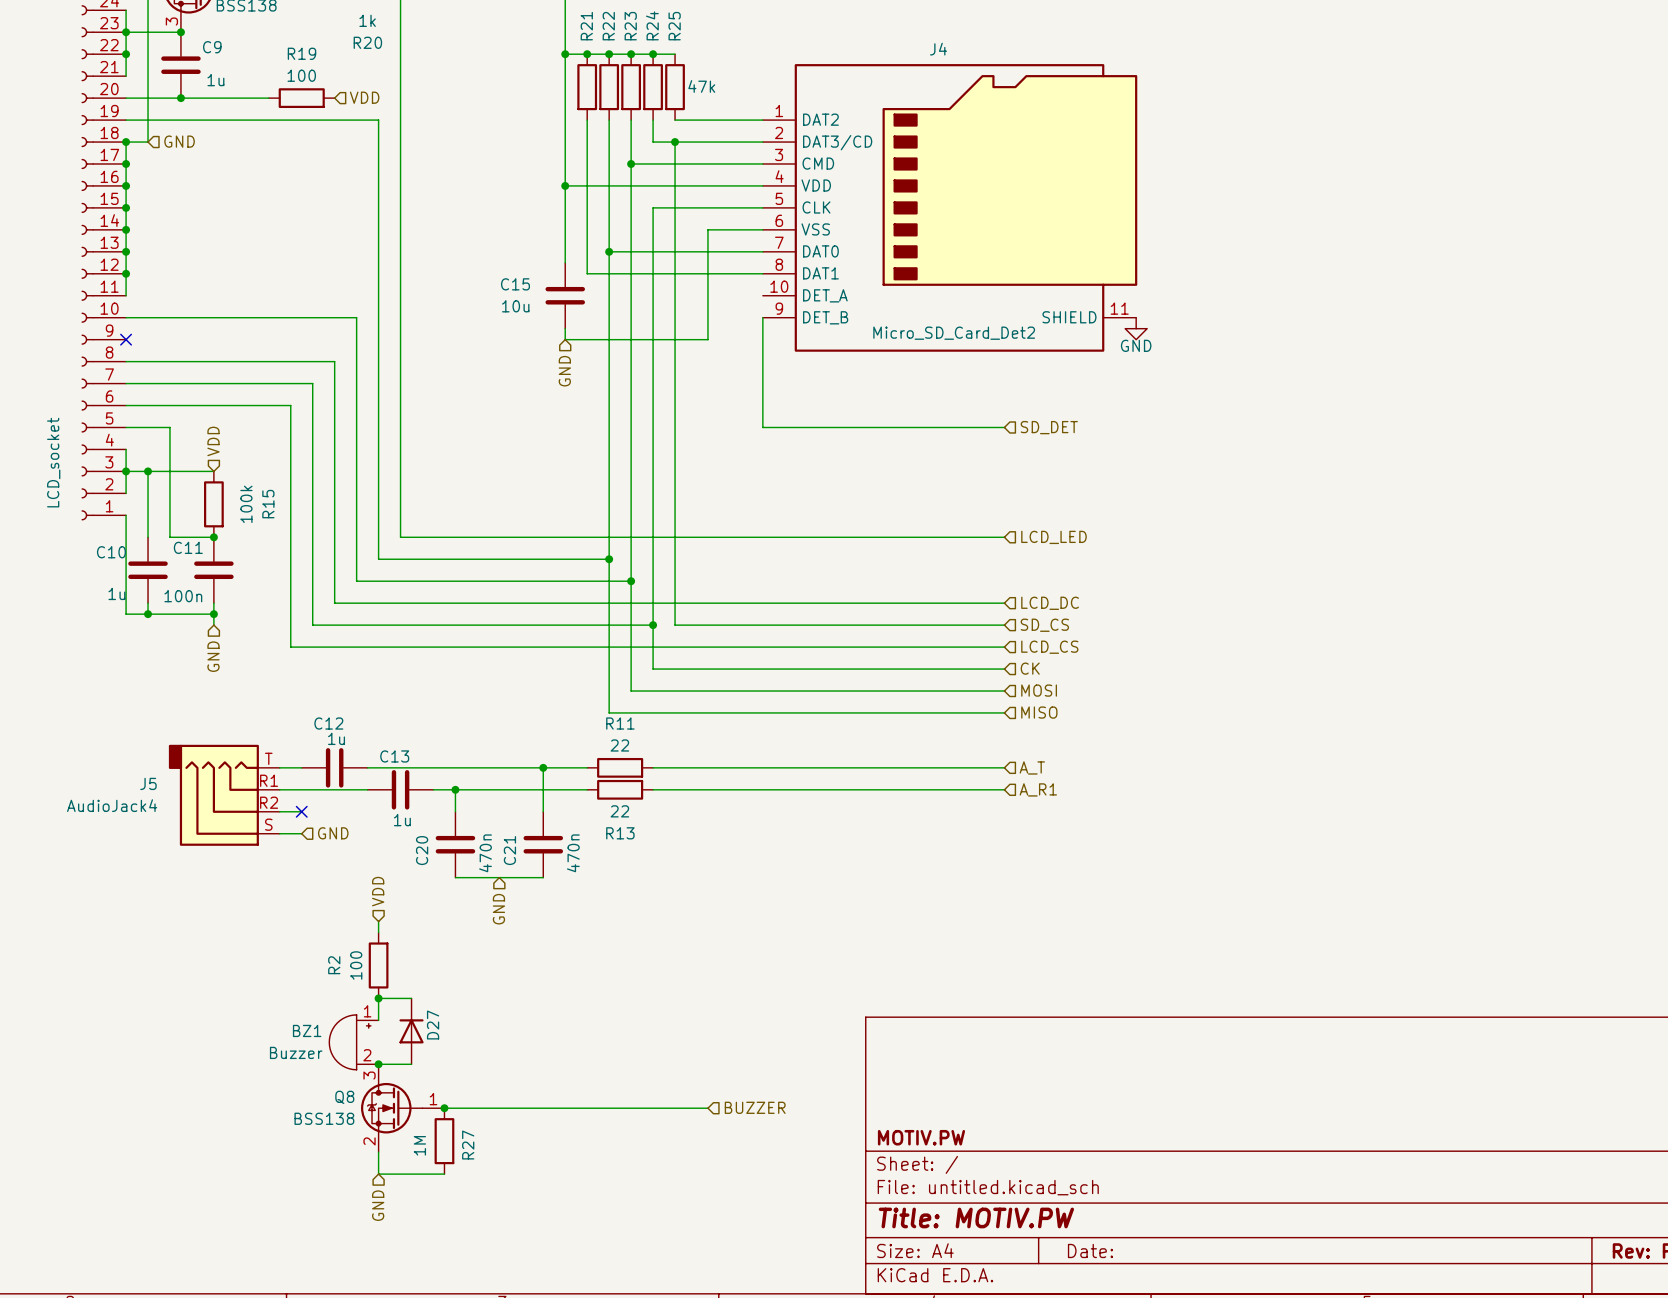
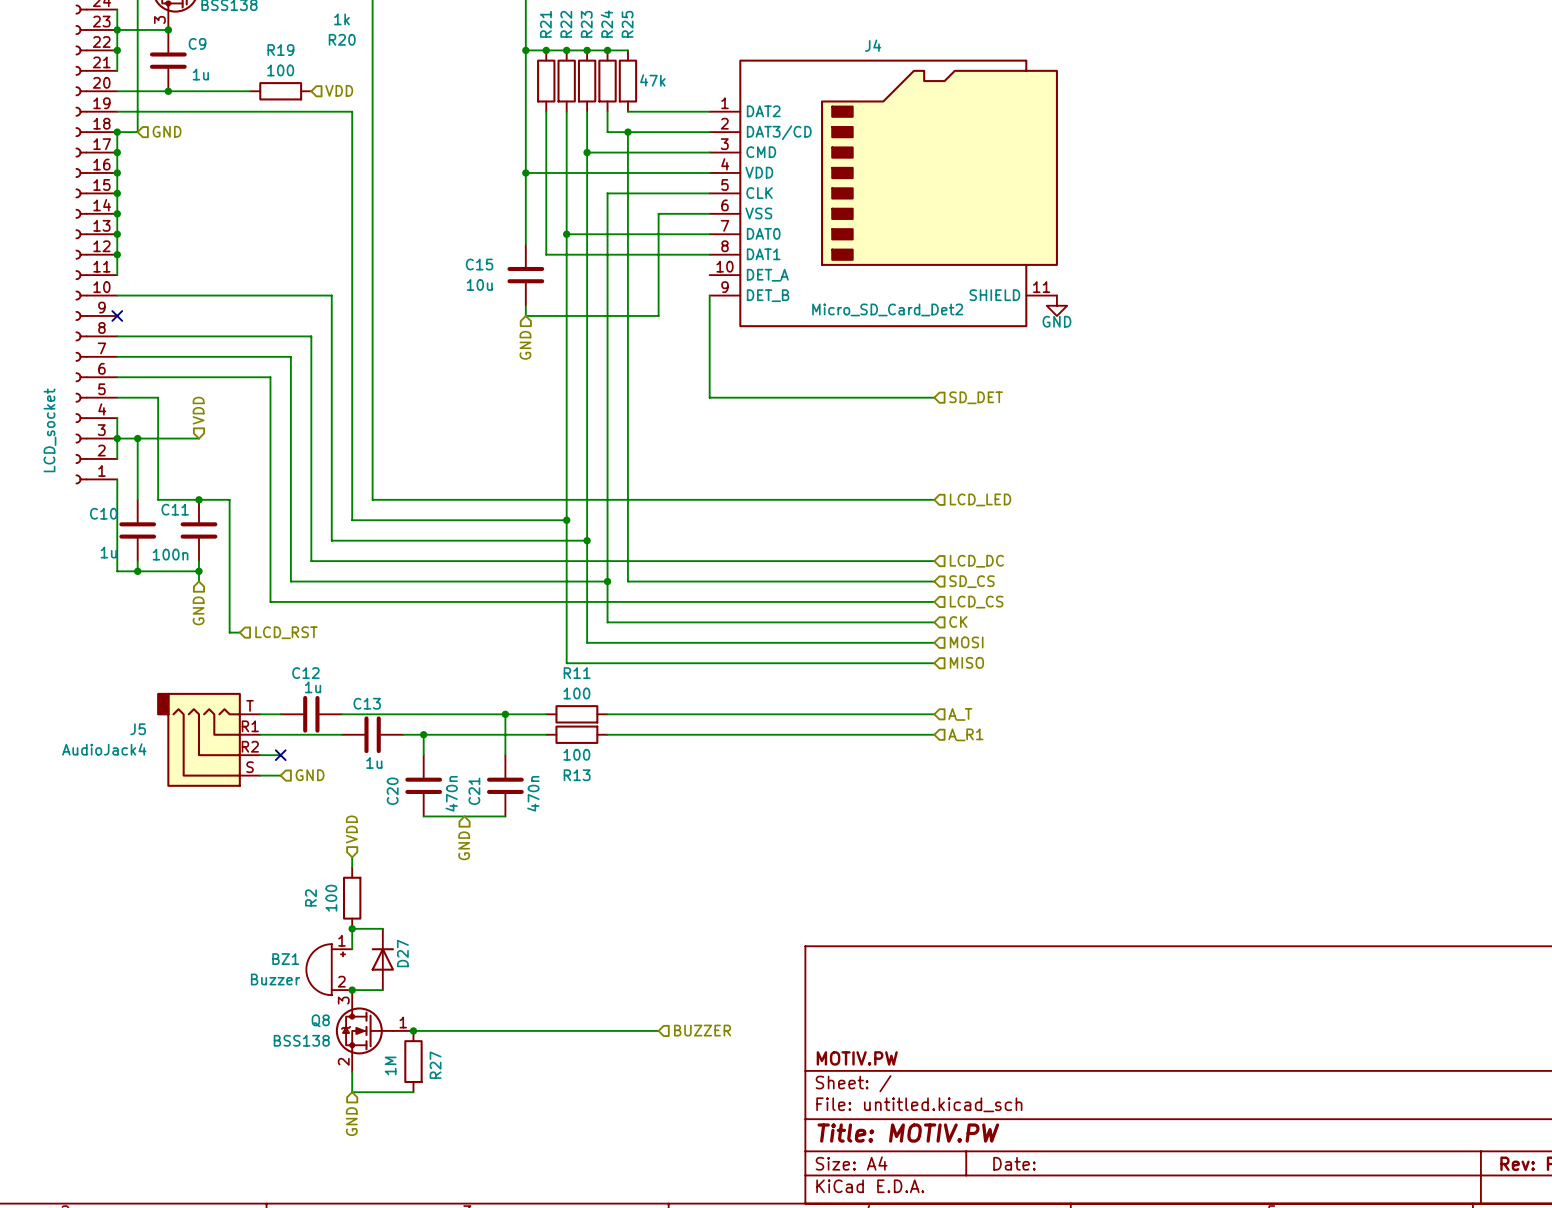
R15: 100k (213, 504) -> none
wire: none -> (198, 499) (229, 499) (229, 632) (239, 632)
hierarchical label: none -> LCD_RST (286, 632)
R11 value: 22 (619, 745) -> 100 (576, 693)
R13 value: 22 (619, 811) -> 100 (576, 754)

